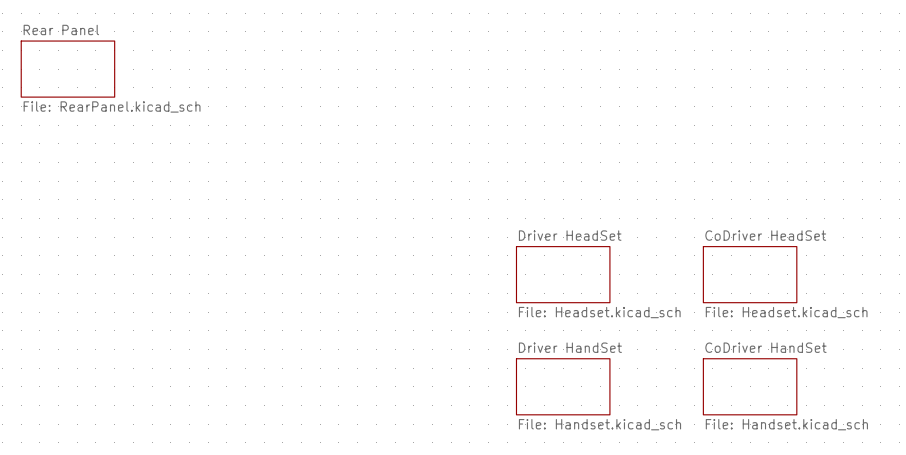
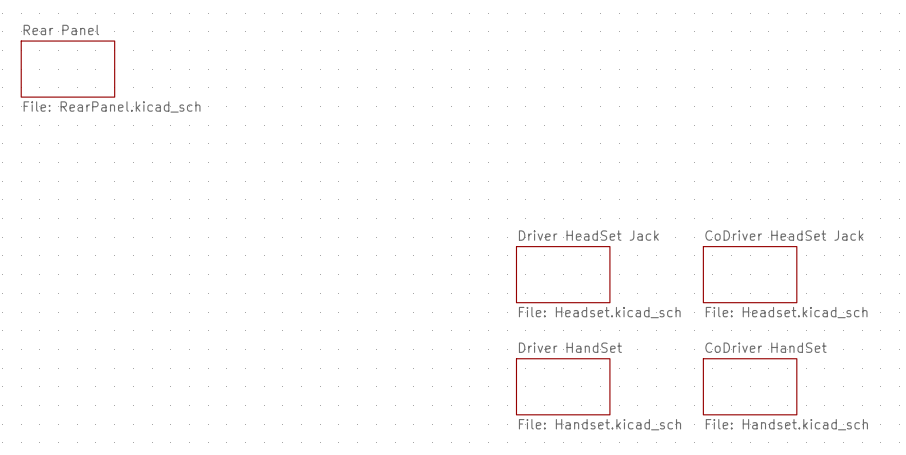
sheet Driver HeadSet name: Driver HeadSet (570, 235) -> Driver HeadSet Jack (588, 235)
sheet CoDriver HeadSet name: CoDriver HeadSet (765, 235) -> CoDriver HeadSet Jack (784, 235)

